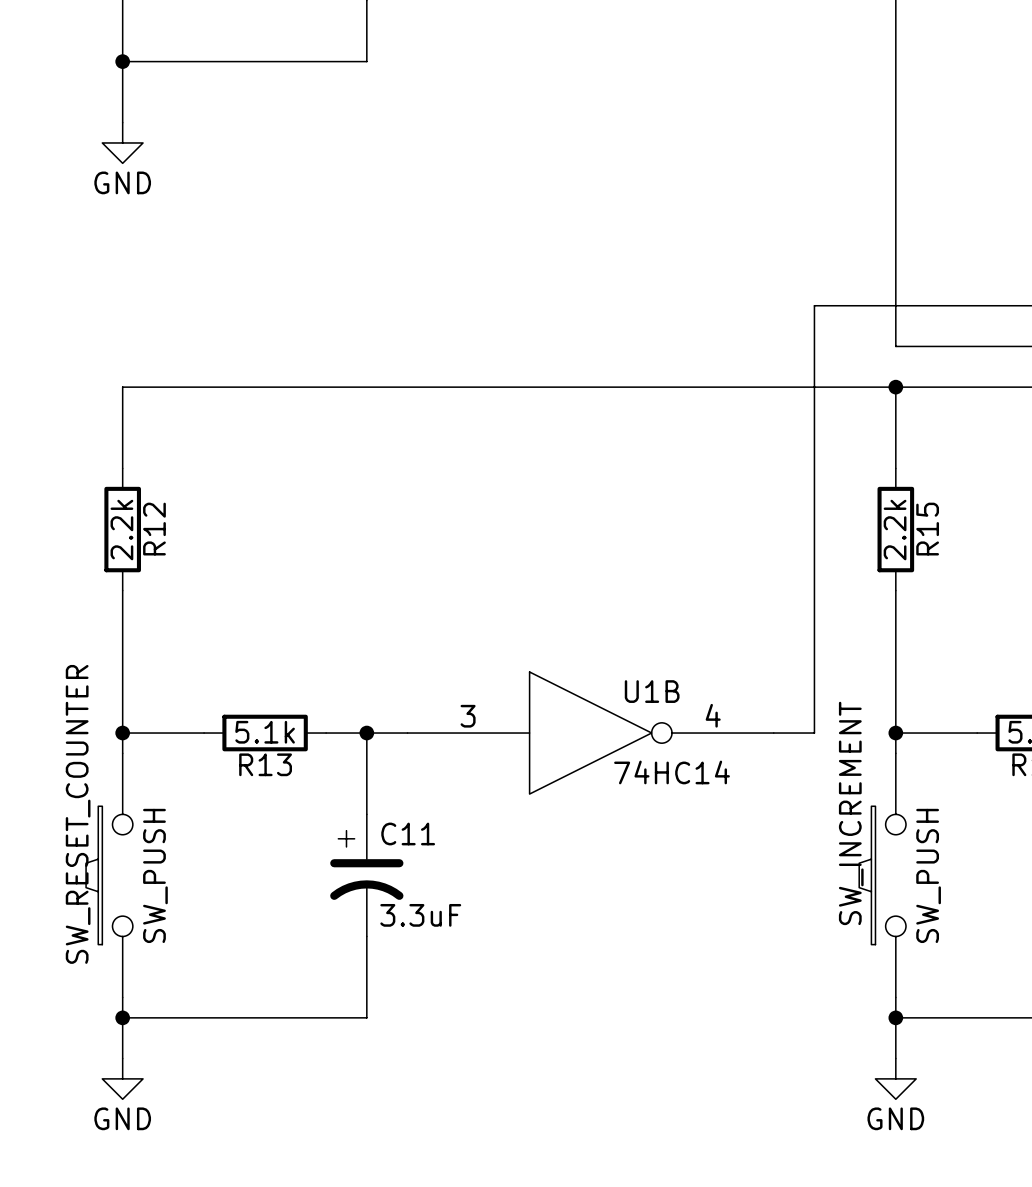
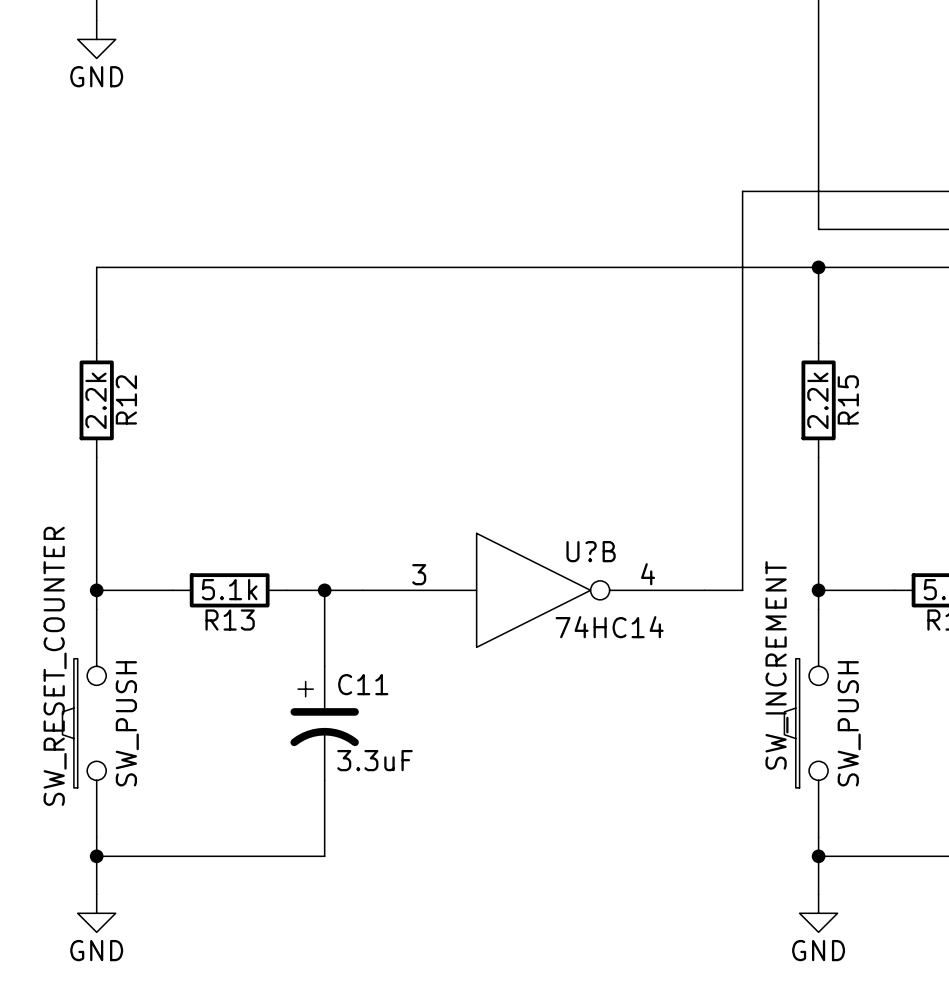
U1B name: U1B (652, 691) -> U?B (591, 551)

